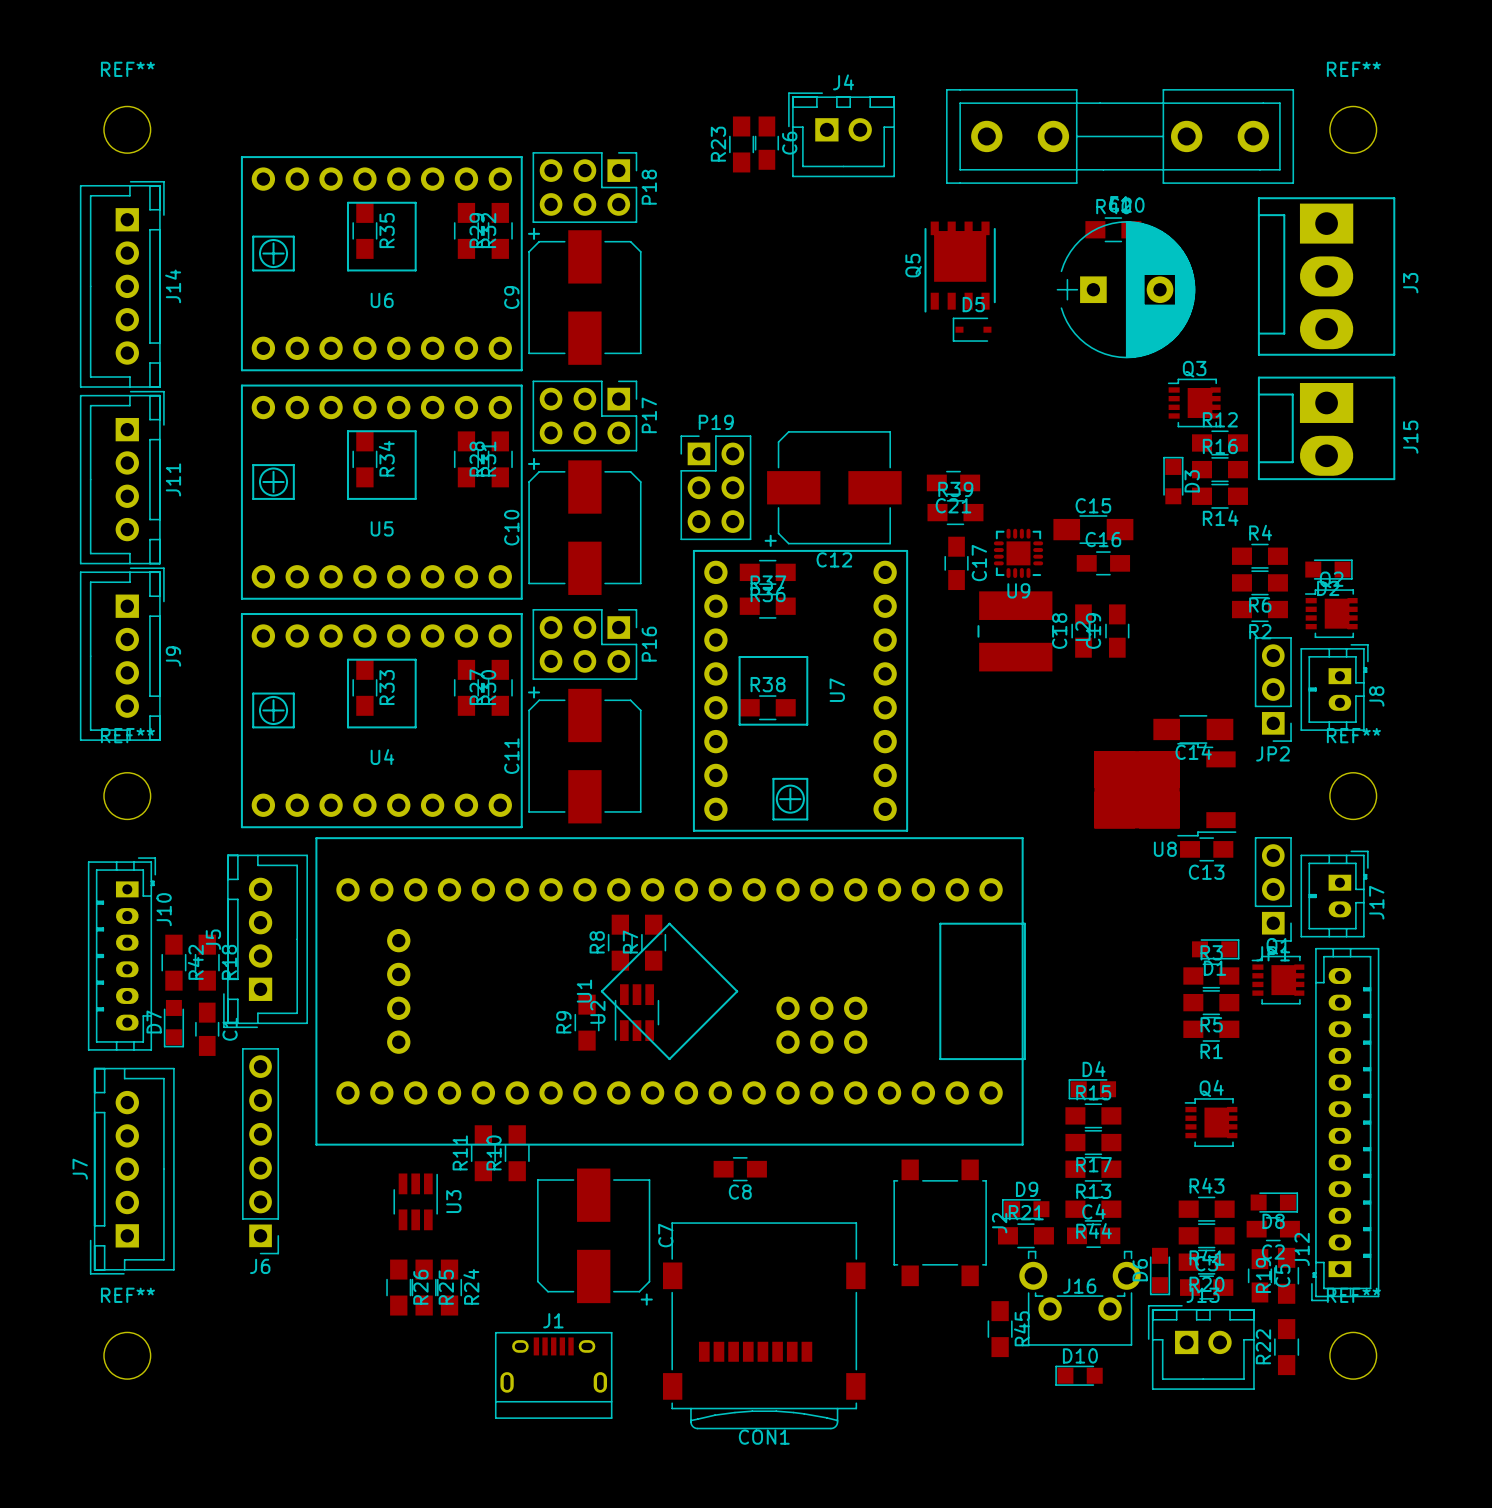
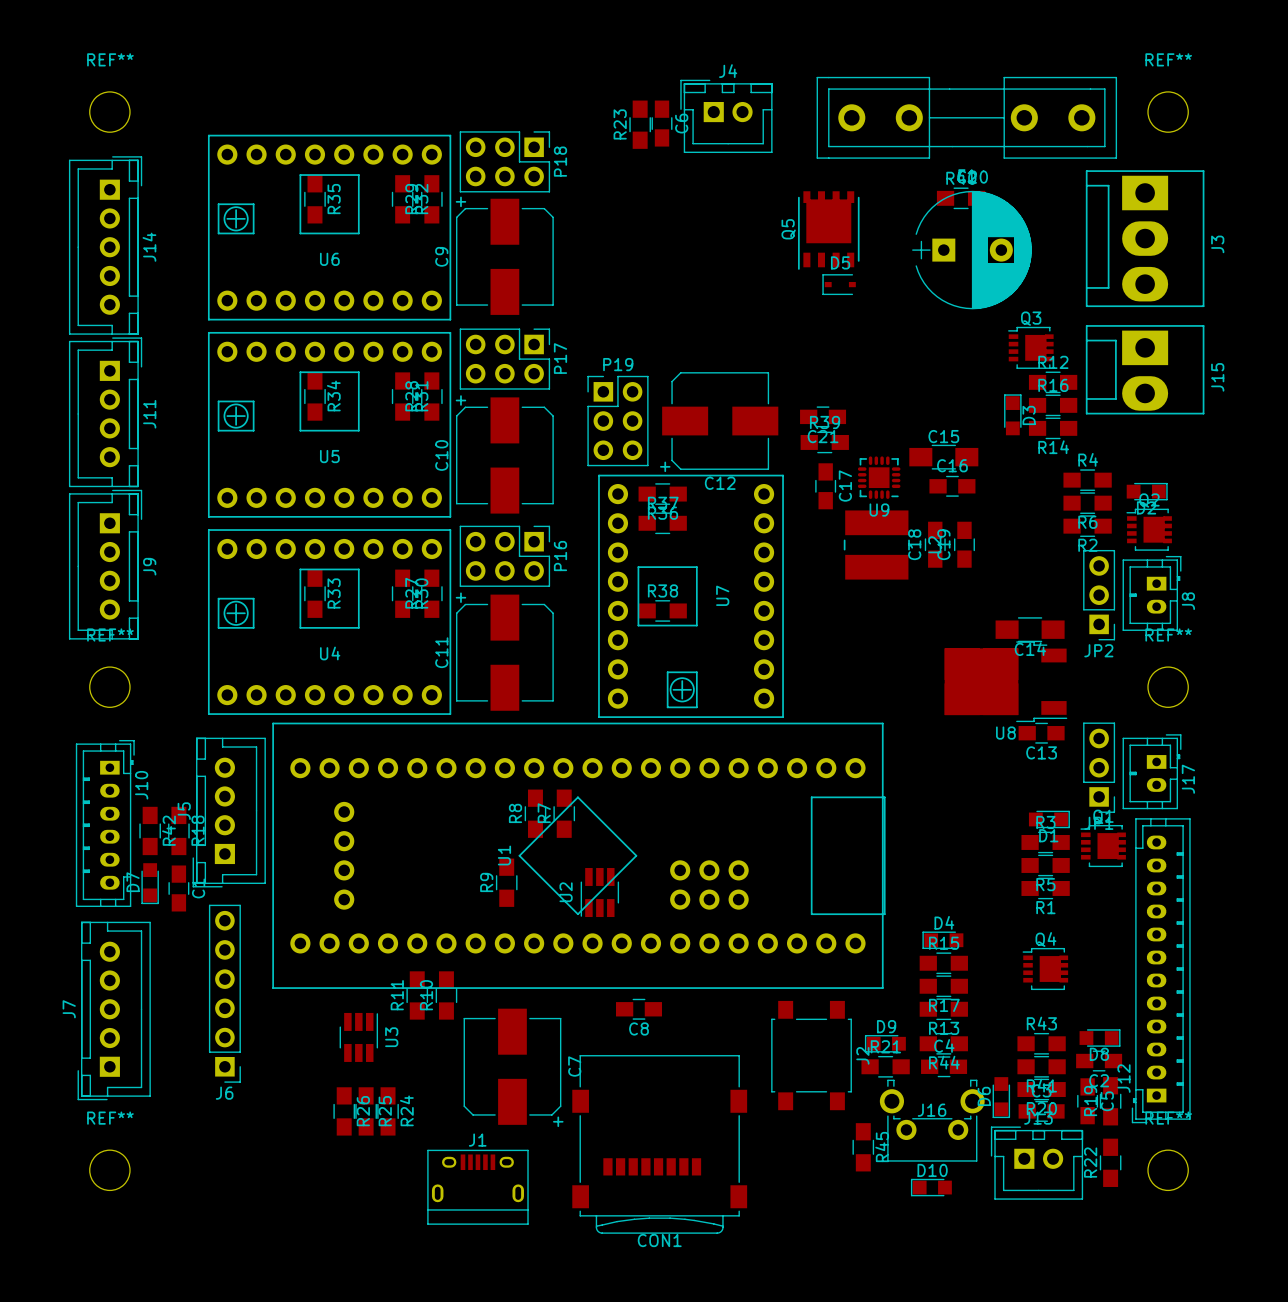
U2 position: (637, 1012) -> (599, 892)

